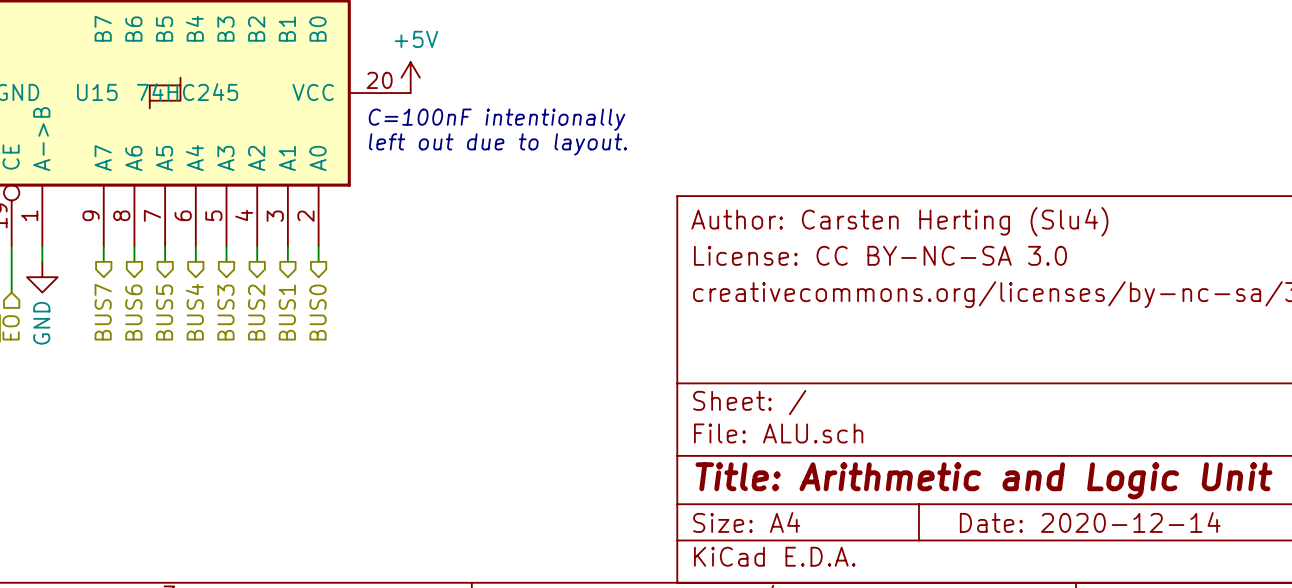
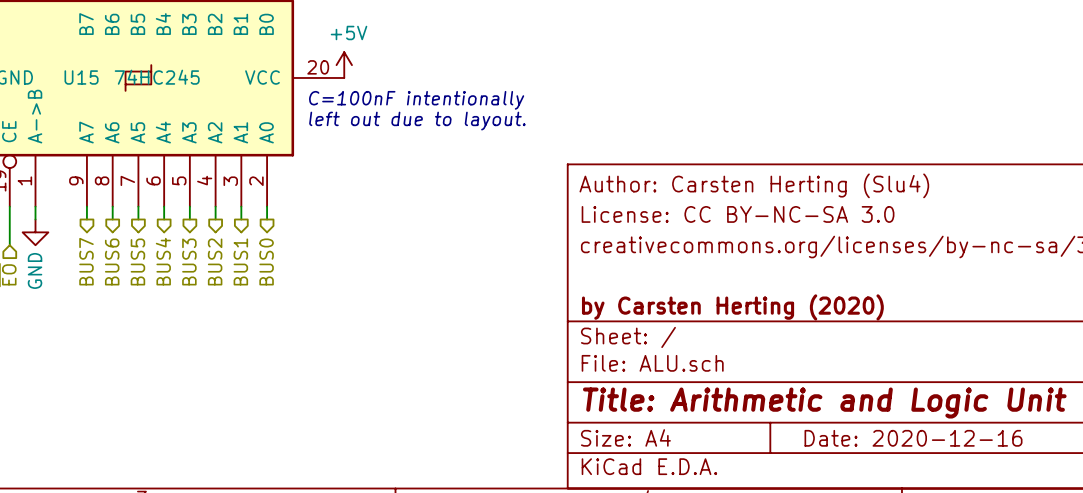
title block: none -> by Carsten Herting (2020) (732, 307)
title block: Date: 2020-12-14 (1090, 522) -> Date: 2020-12-16 (913, 438)

